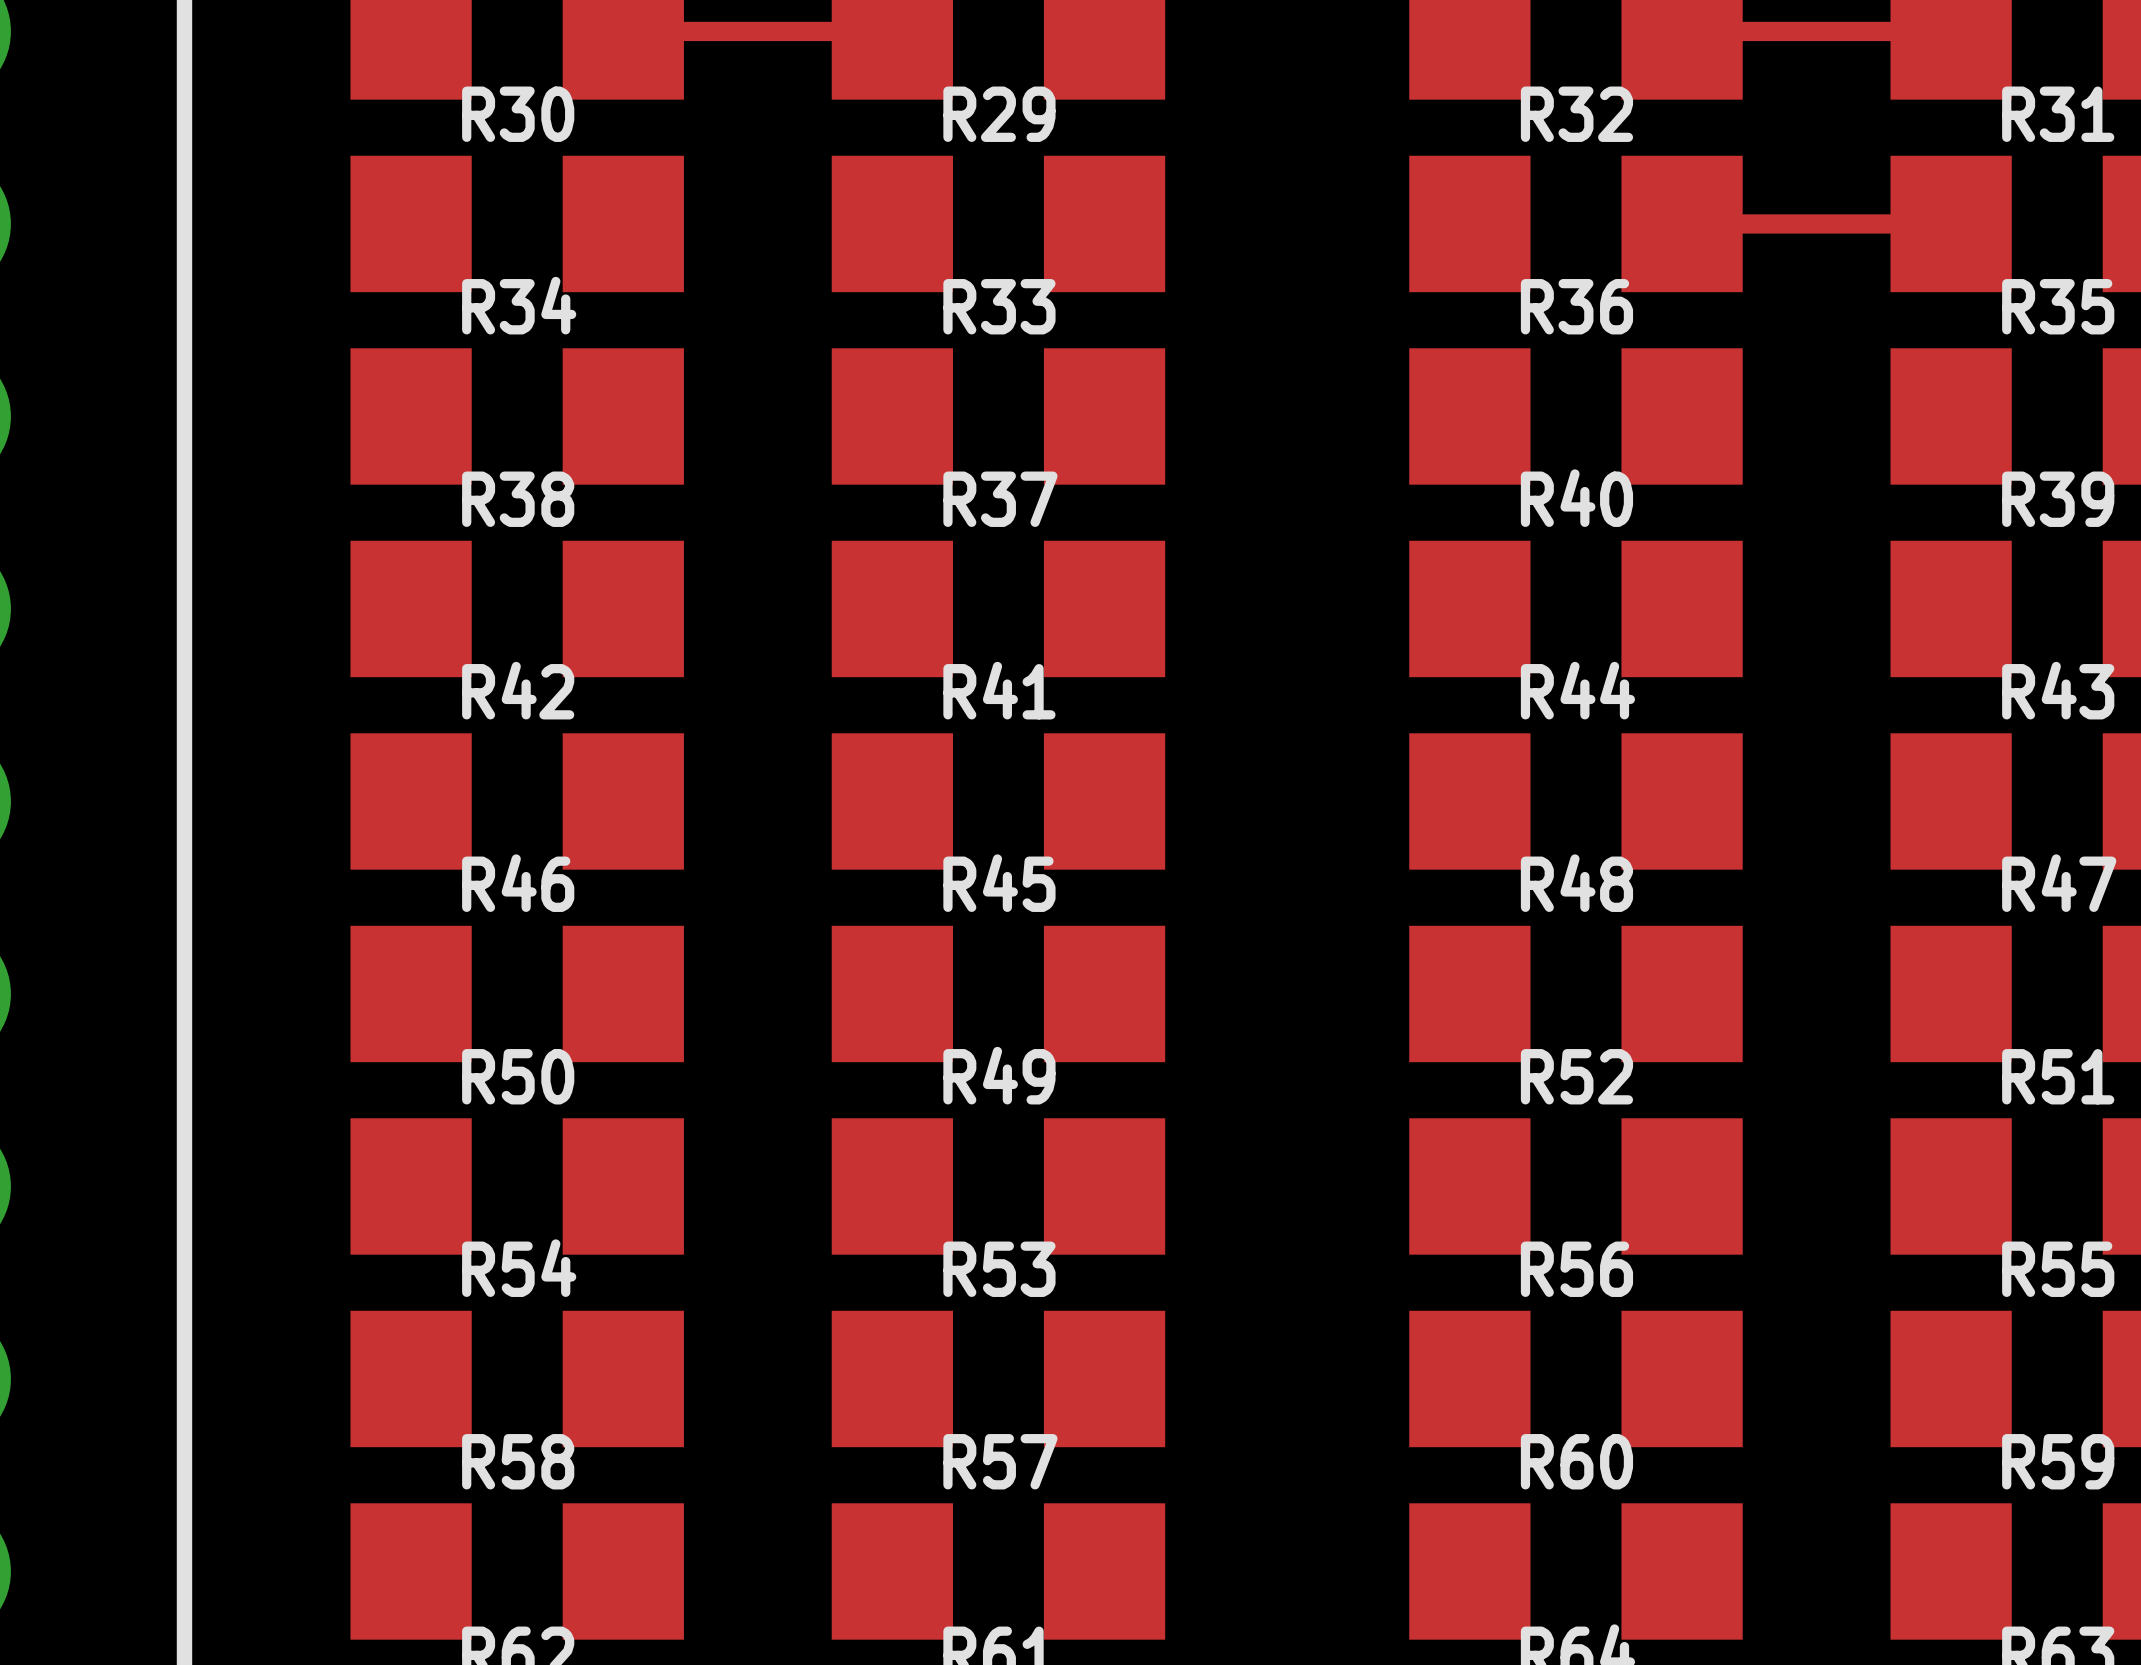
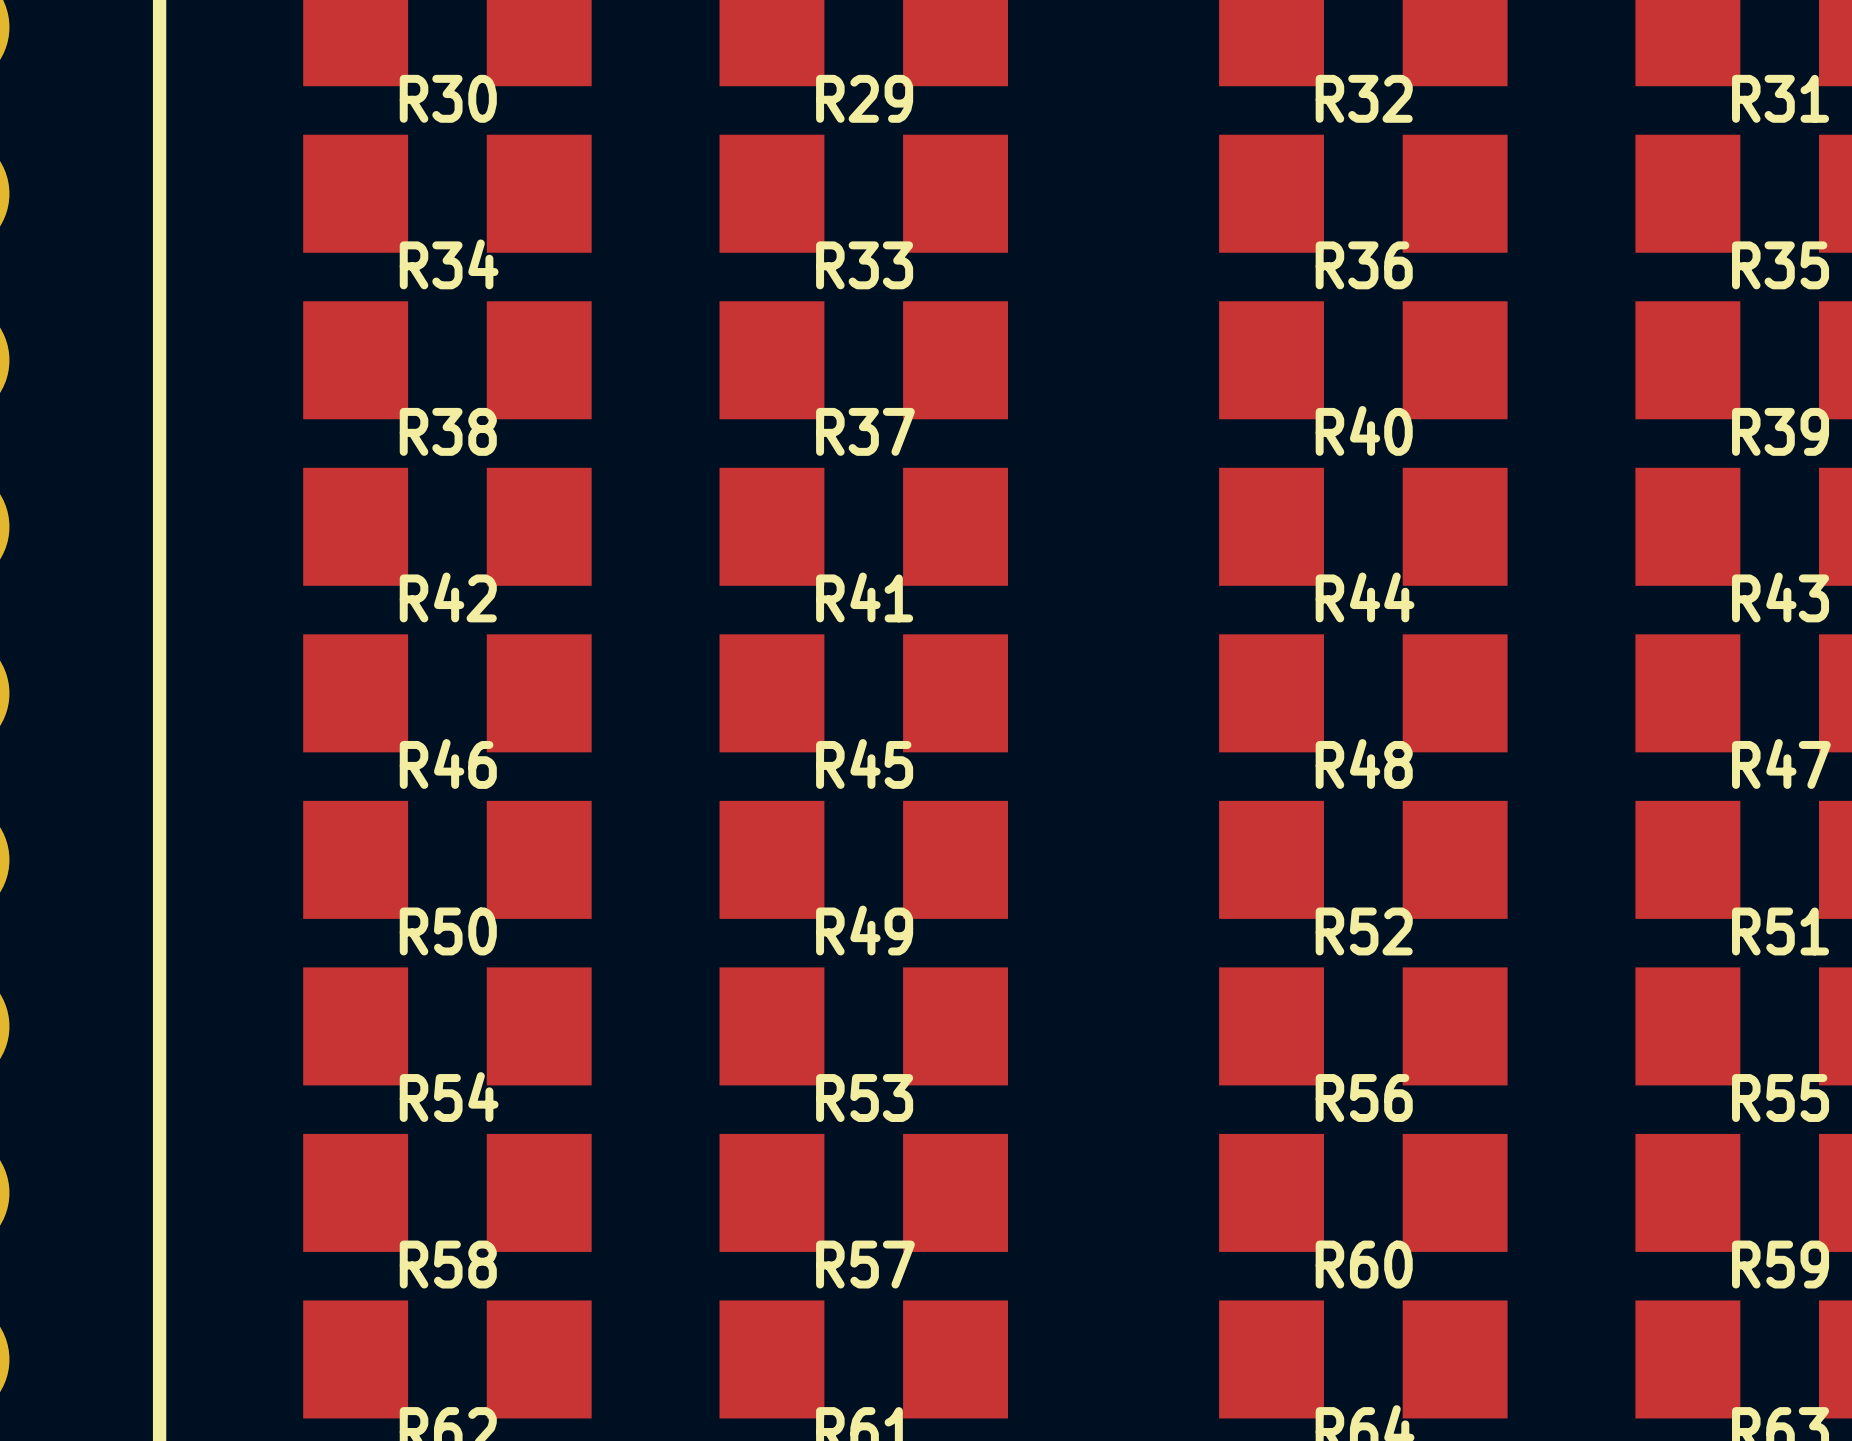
track: (623, 31) (892, 31) -> none
track: (1682, 31) (1951, 31) -> none
track: (1682, 223) (1951, 223) -> none

